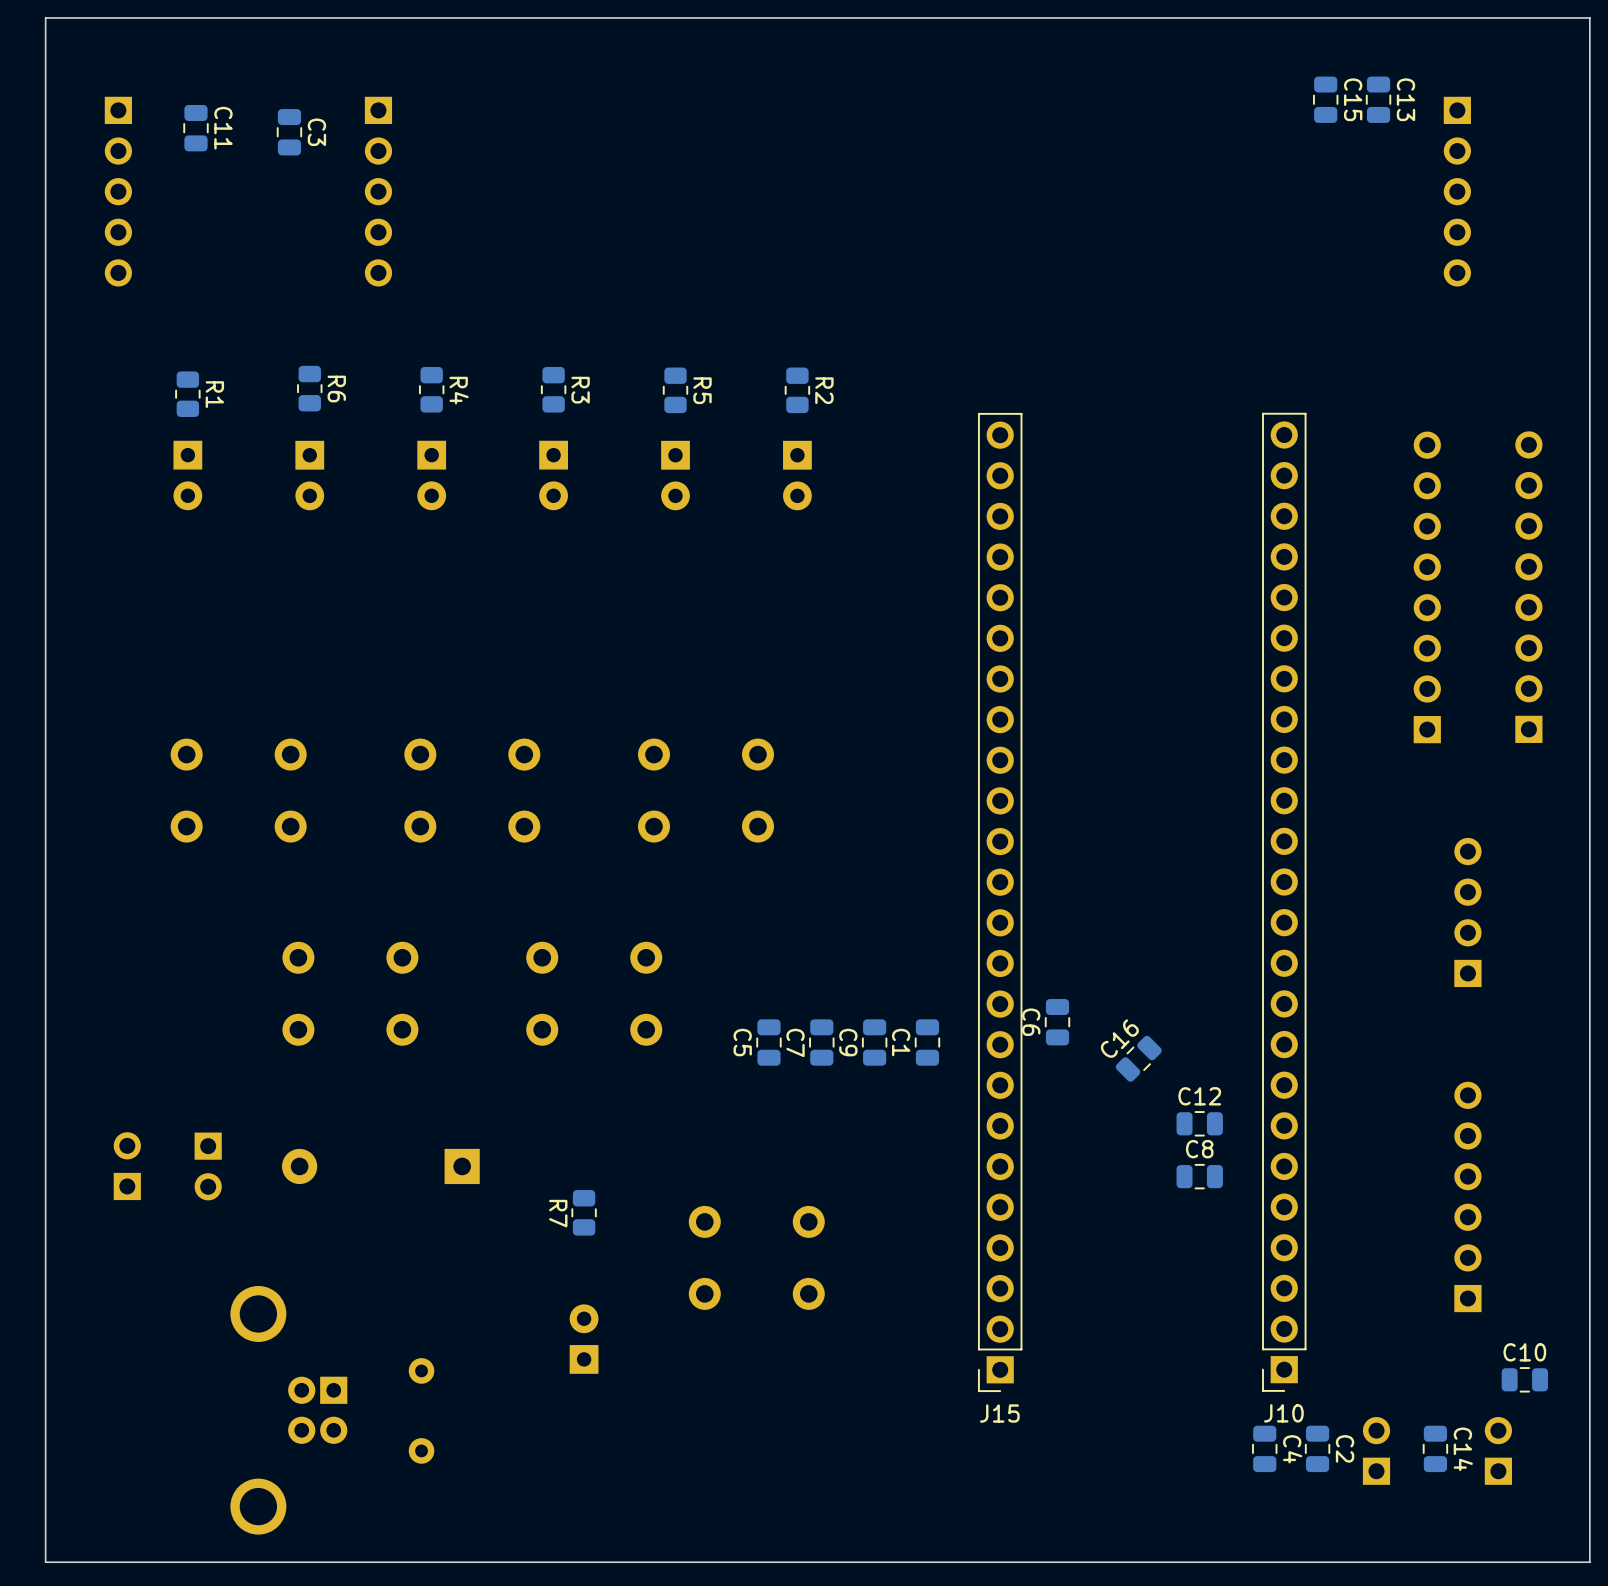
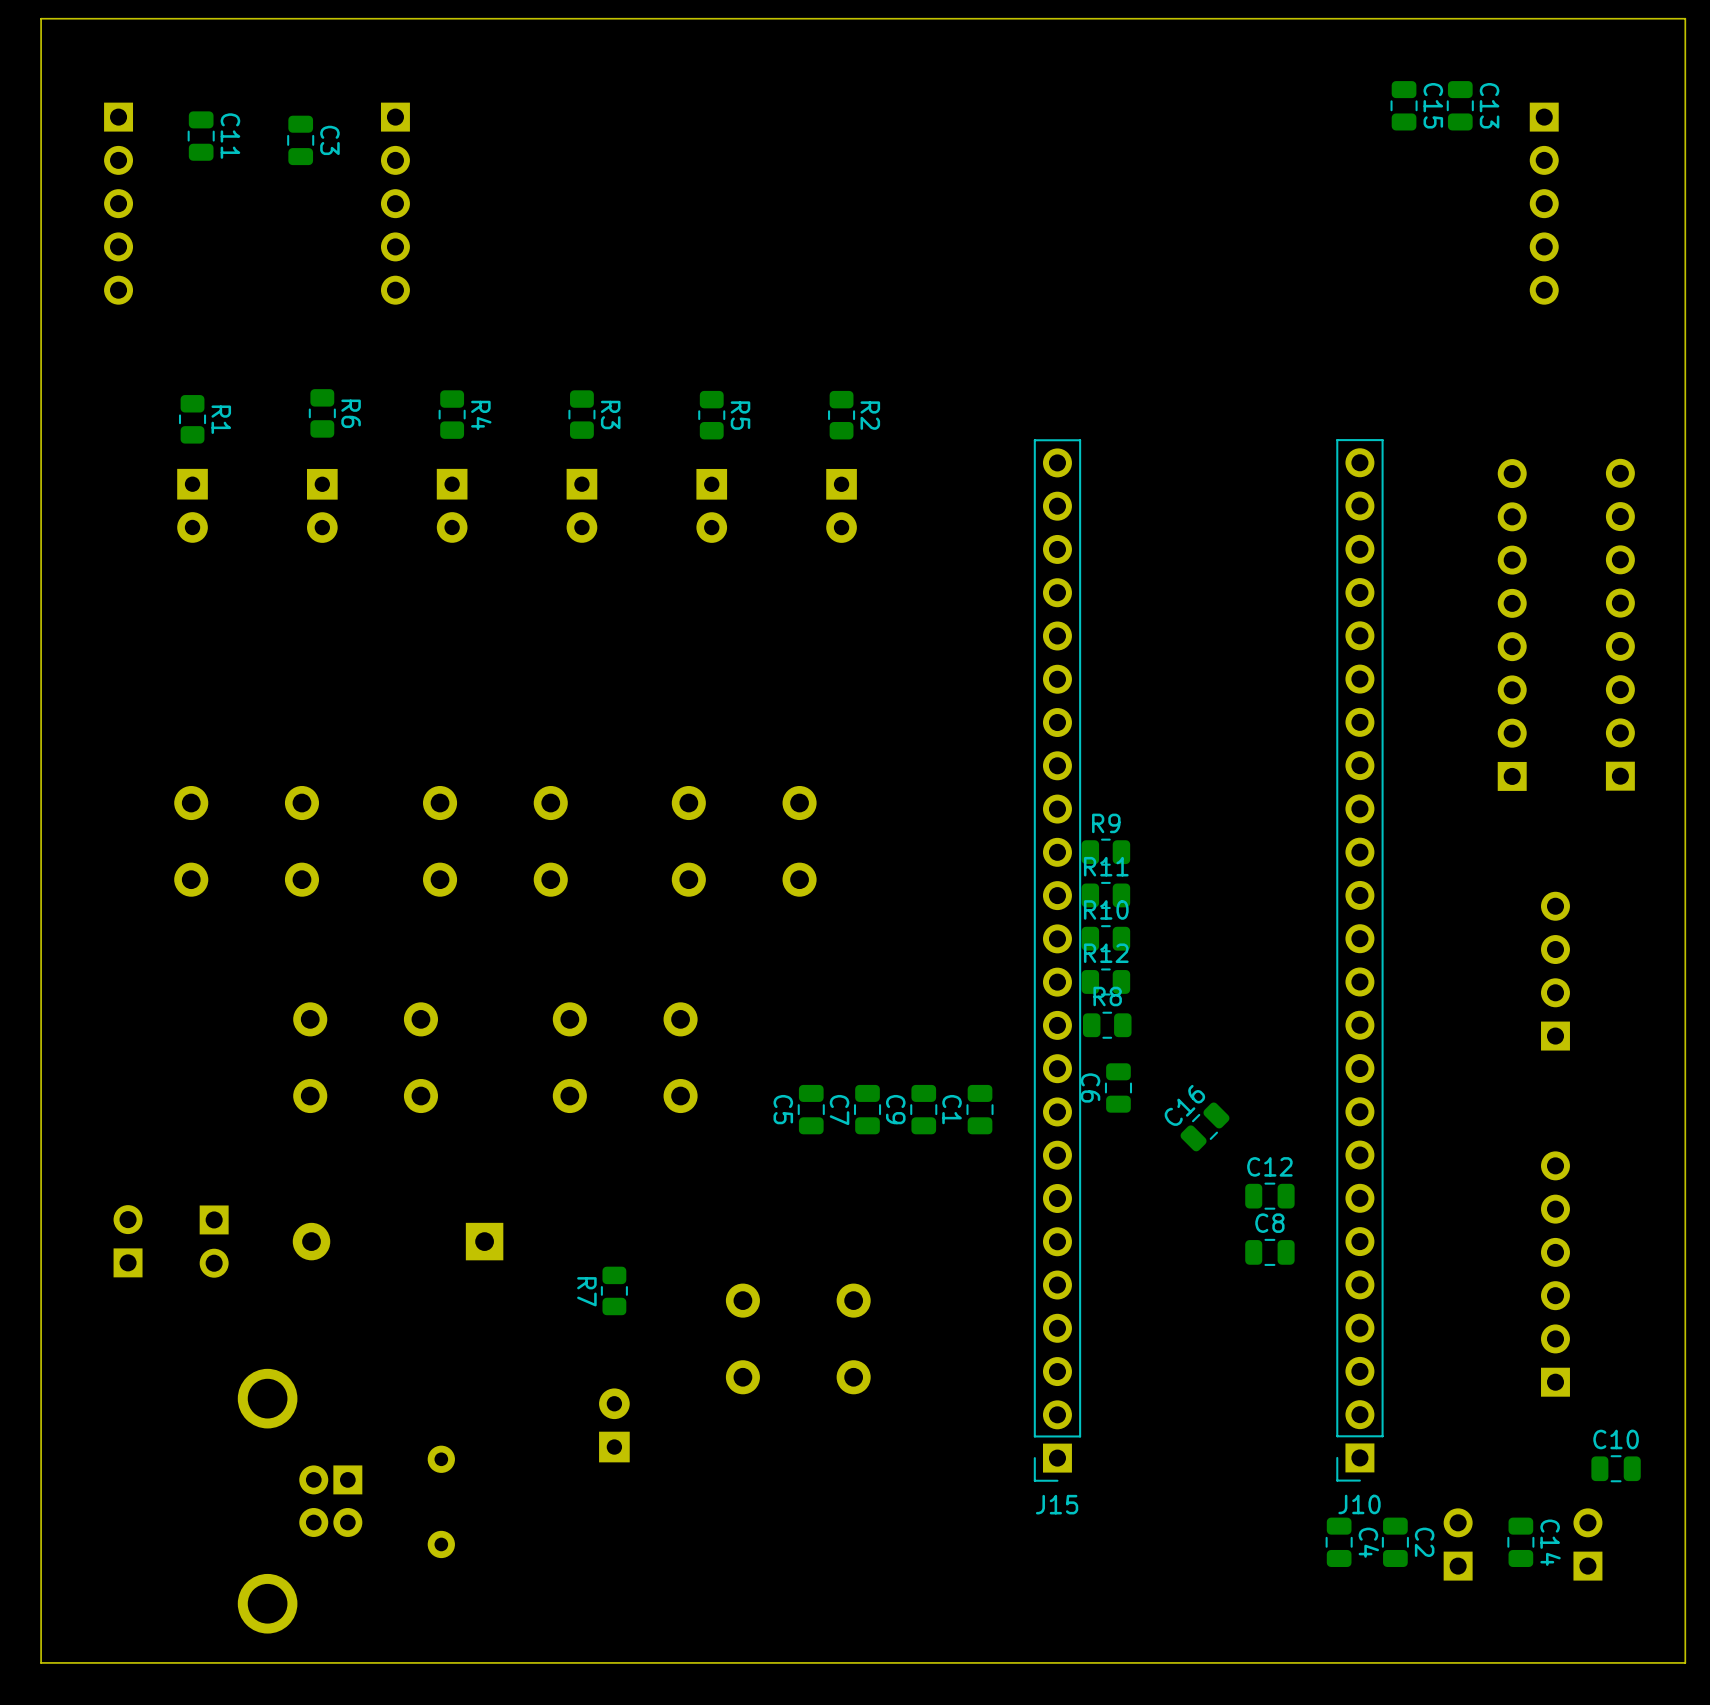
R9: none -> (1105, 852)
R11: none -> (1105, 895)
R10: none -> (1105, 938)
R12: none -> (1105, 981)
R8: none -> (1107, 1025)

